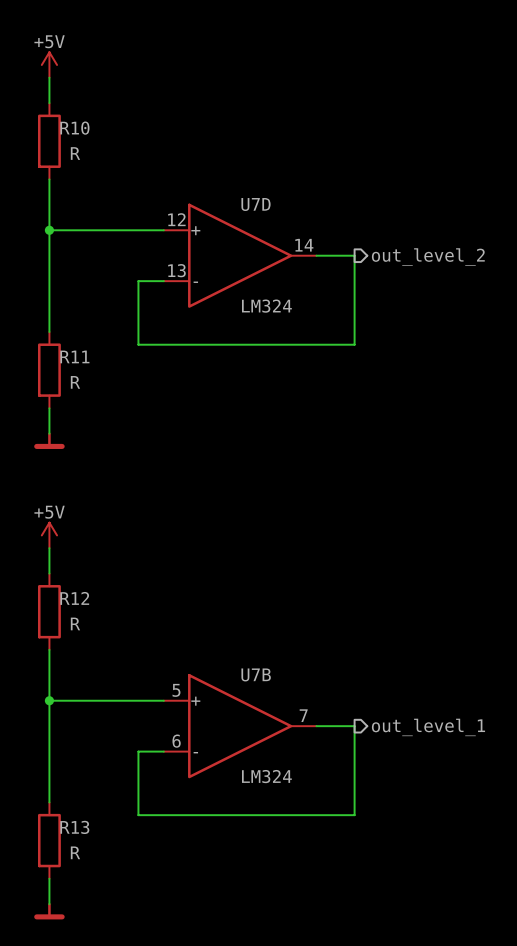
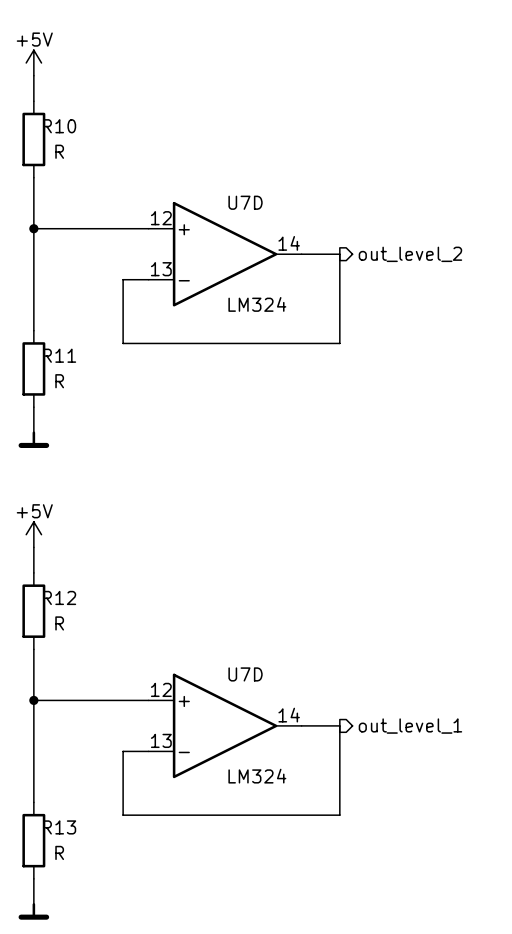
U7B name: U7B (256, 674) -> U7D (245, 674)
U7B pin number: 5 (176, 690) -> 12 (161, 689)
U7B pin number: 7 (303, 715) -> 14 (289, 715)
U7B pin number: 6 (176, 741) -> 13 (161, 740)

